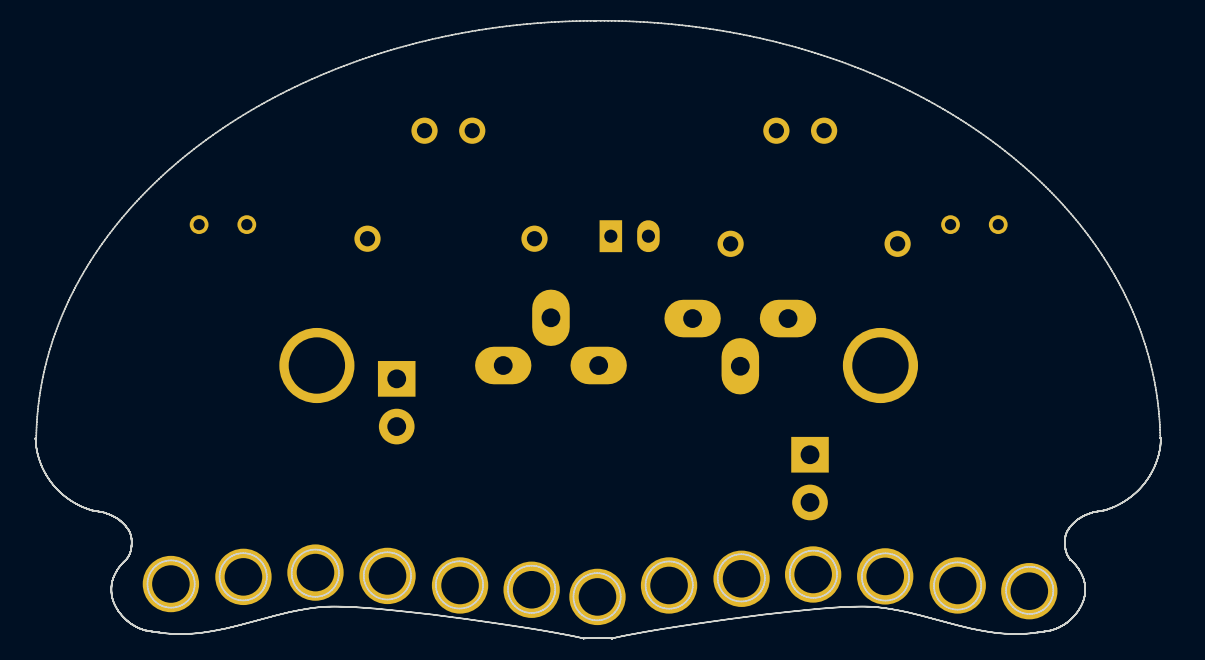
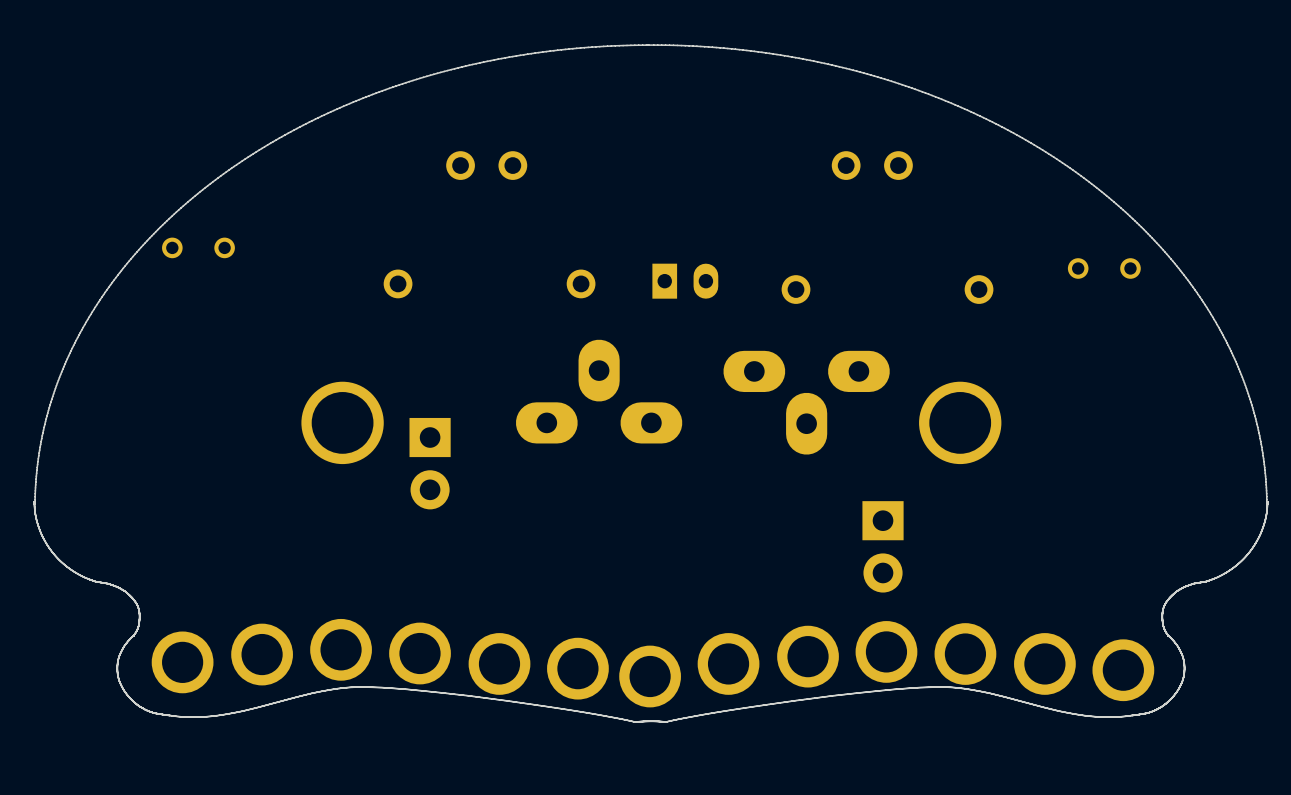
drawing shape: [34, 20, 1162, 640] -> [33, 44, 1269, 723]
part position: (222, 224) -> (198, 247)
part position: (974, 224) -> (1104, 268)

